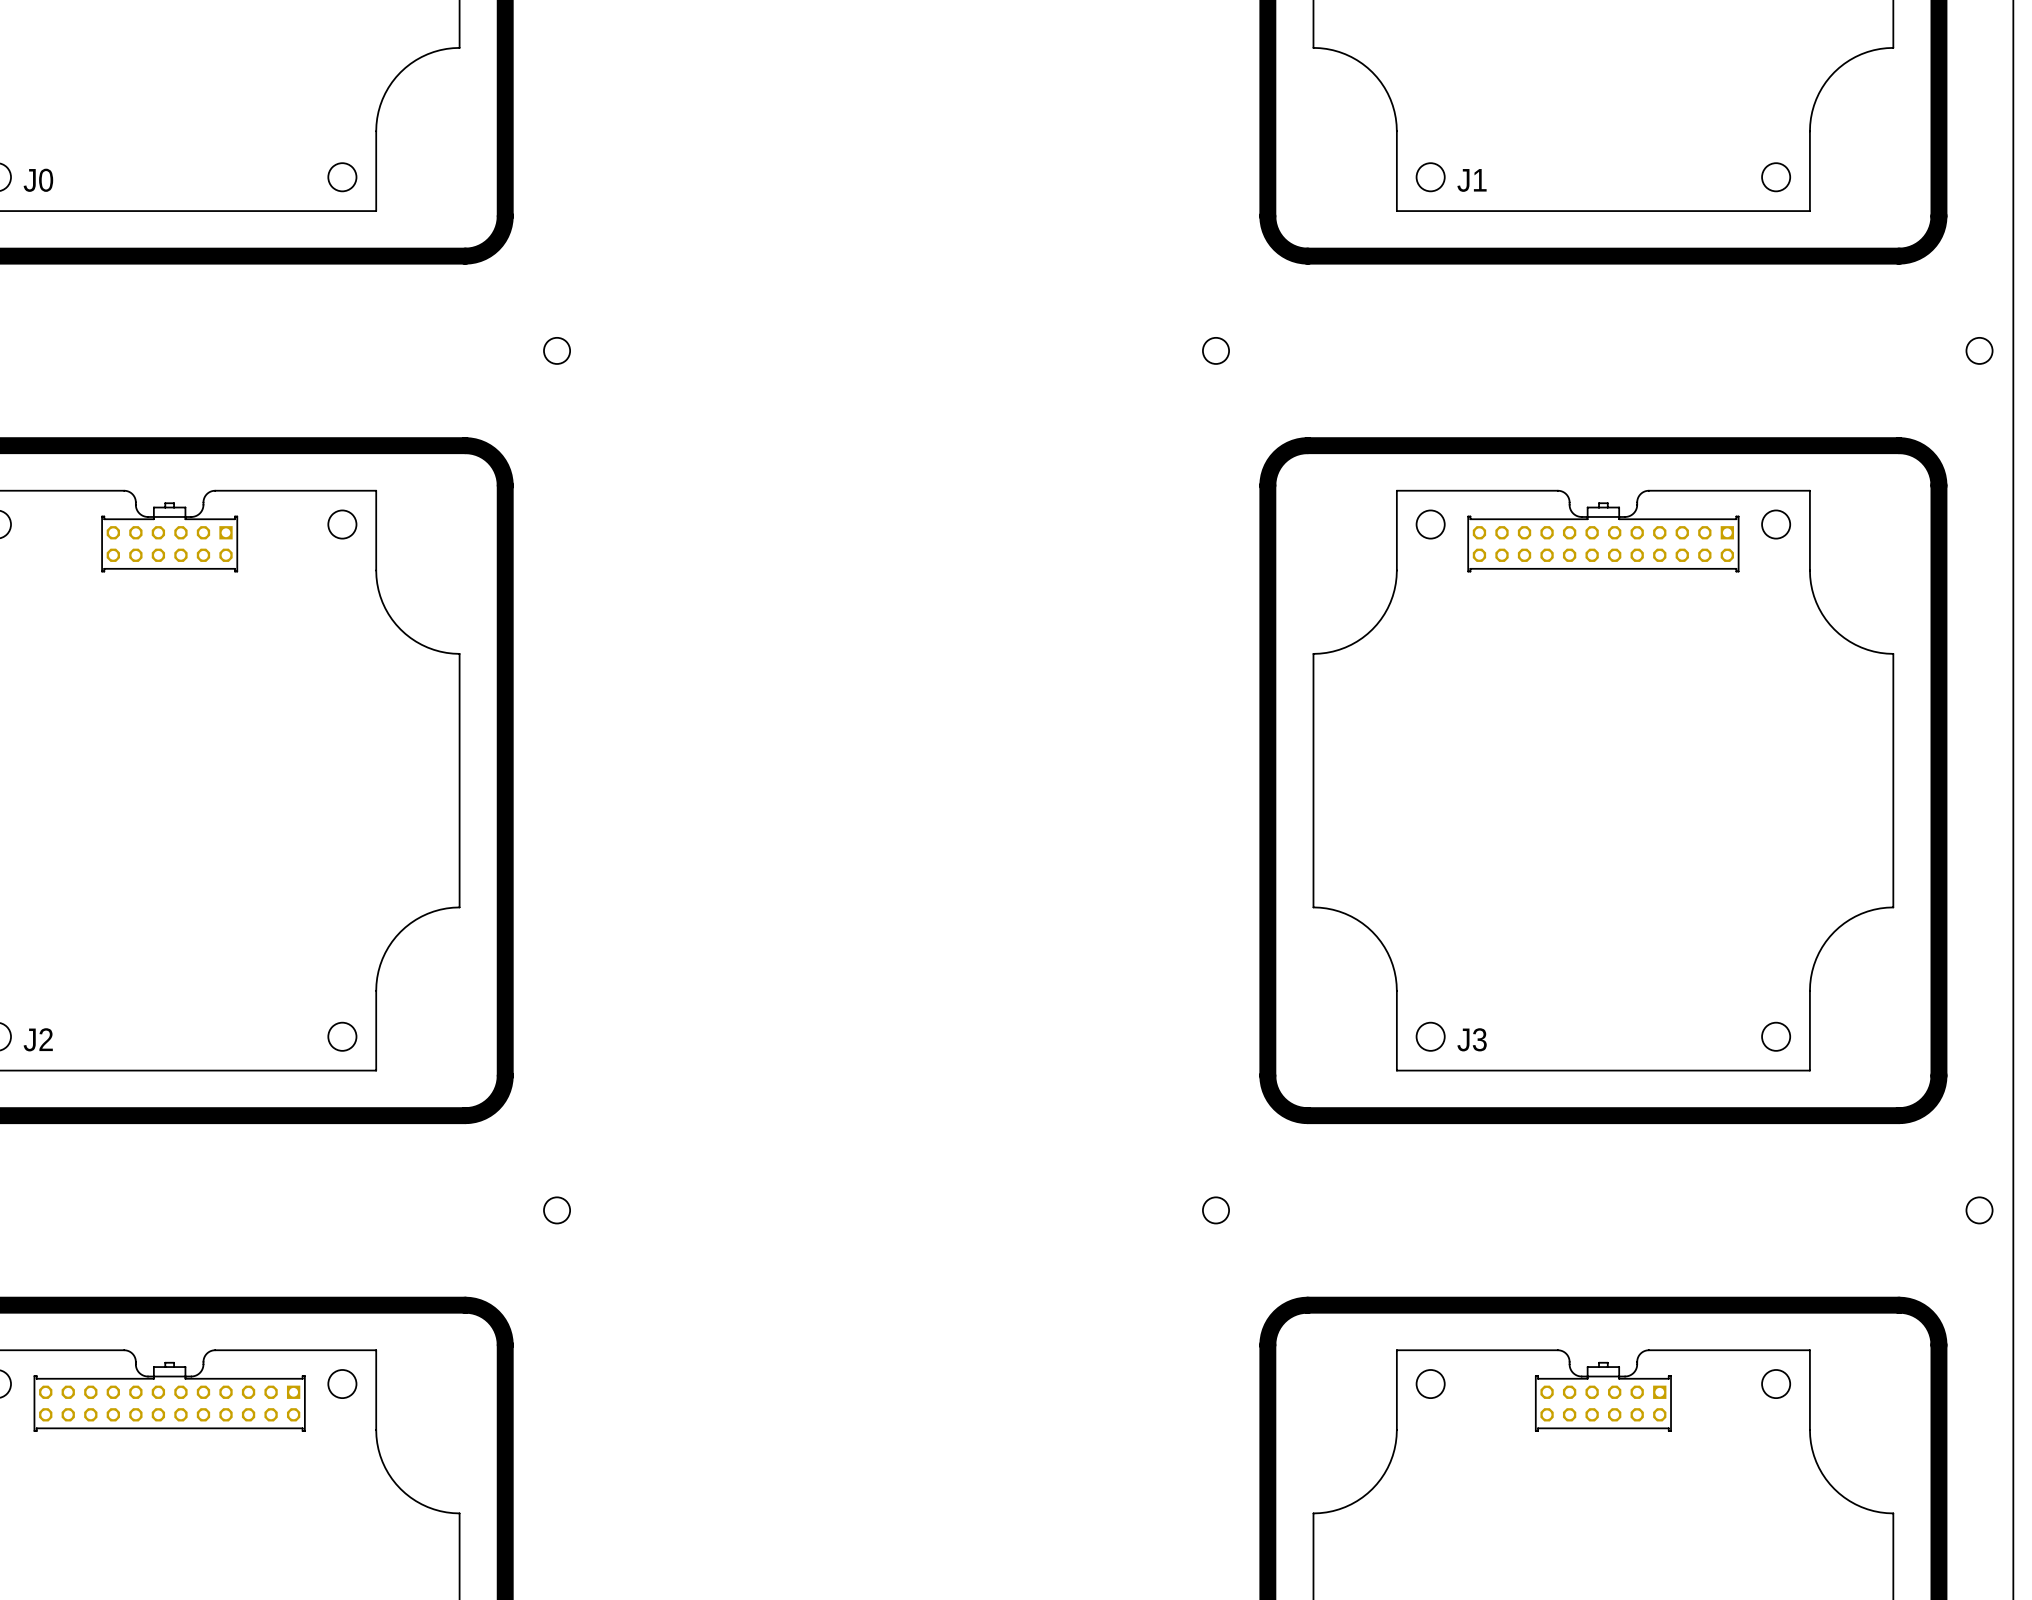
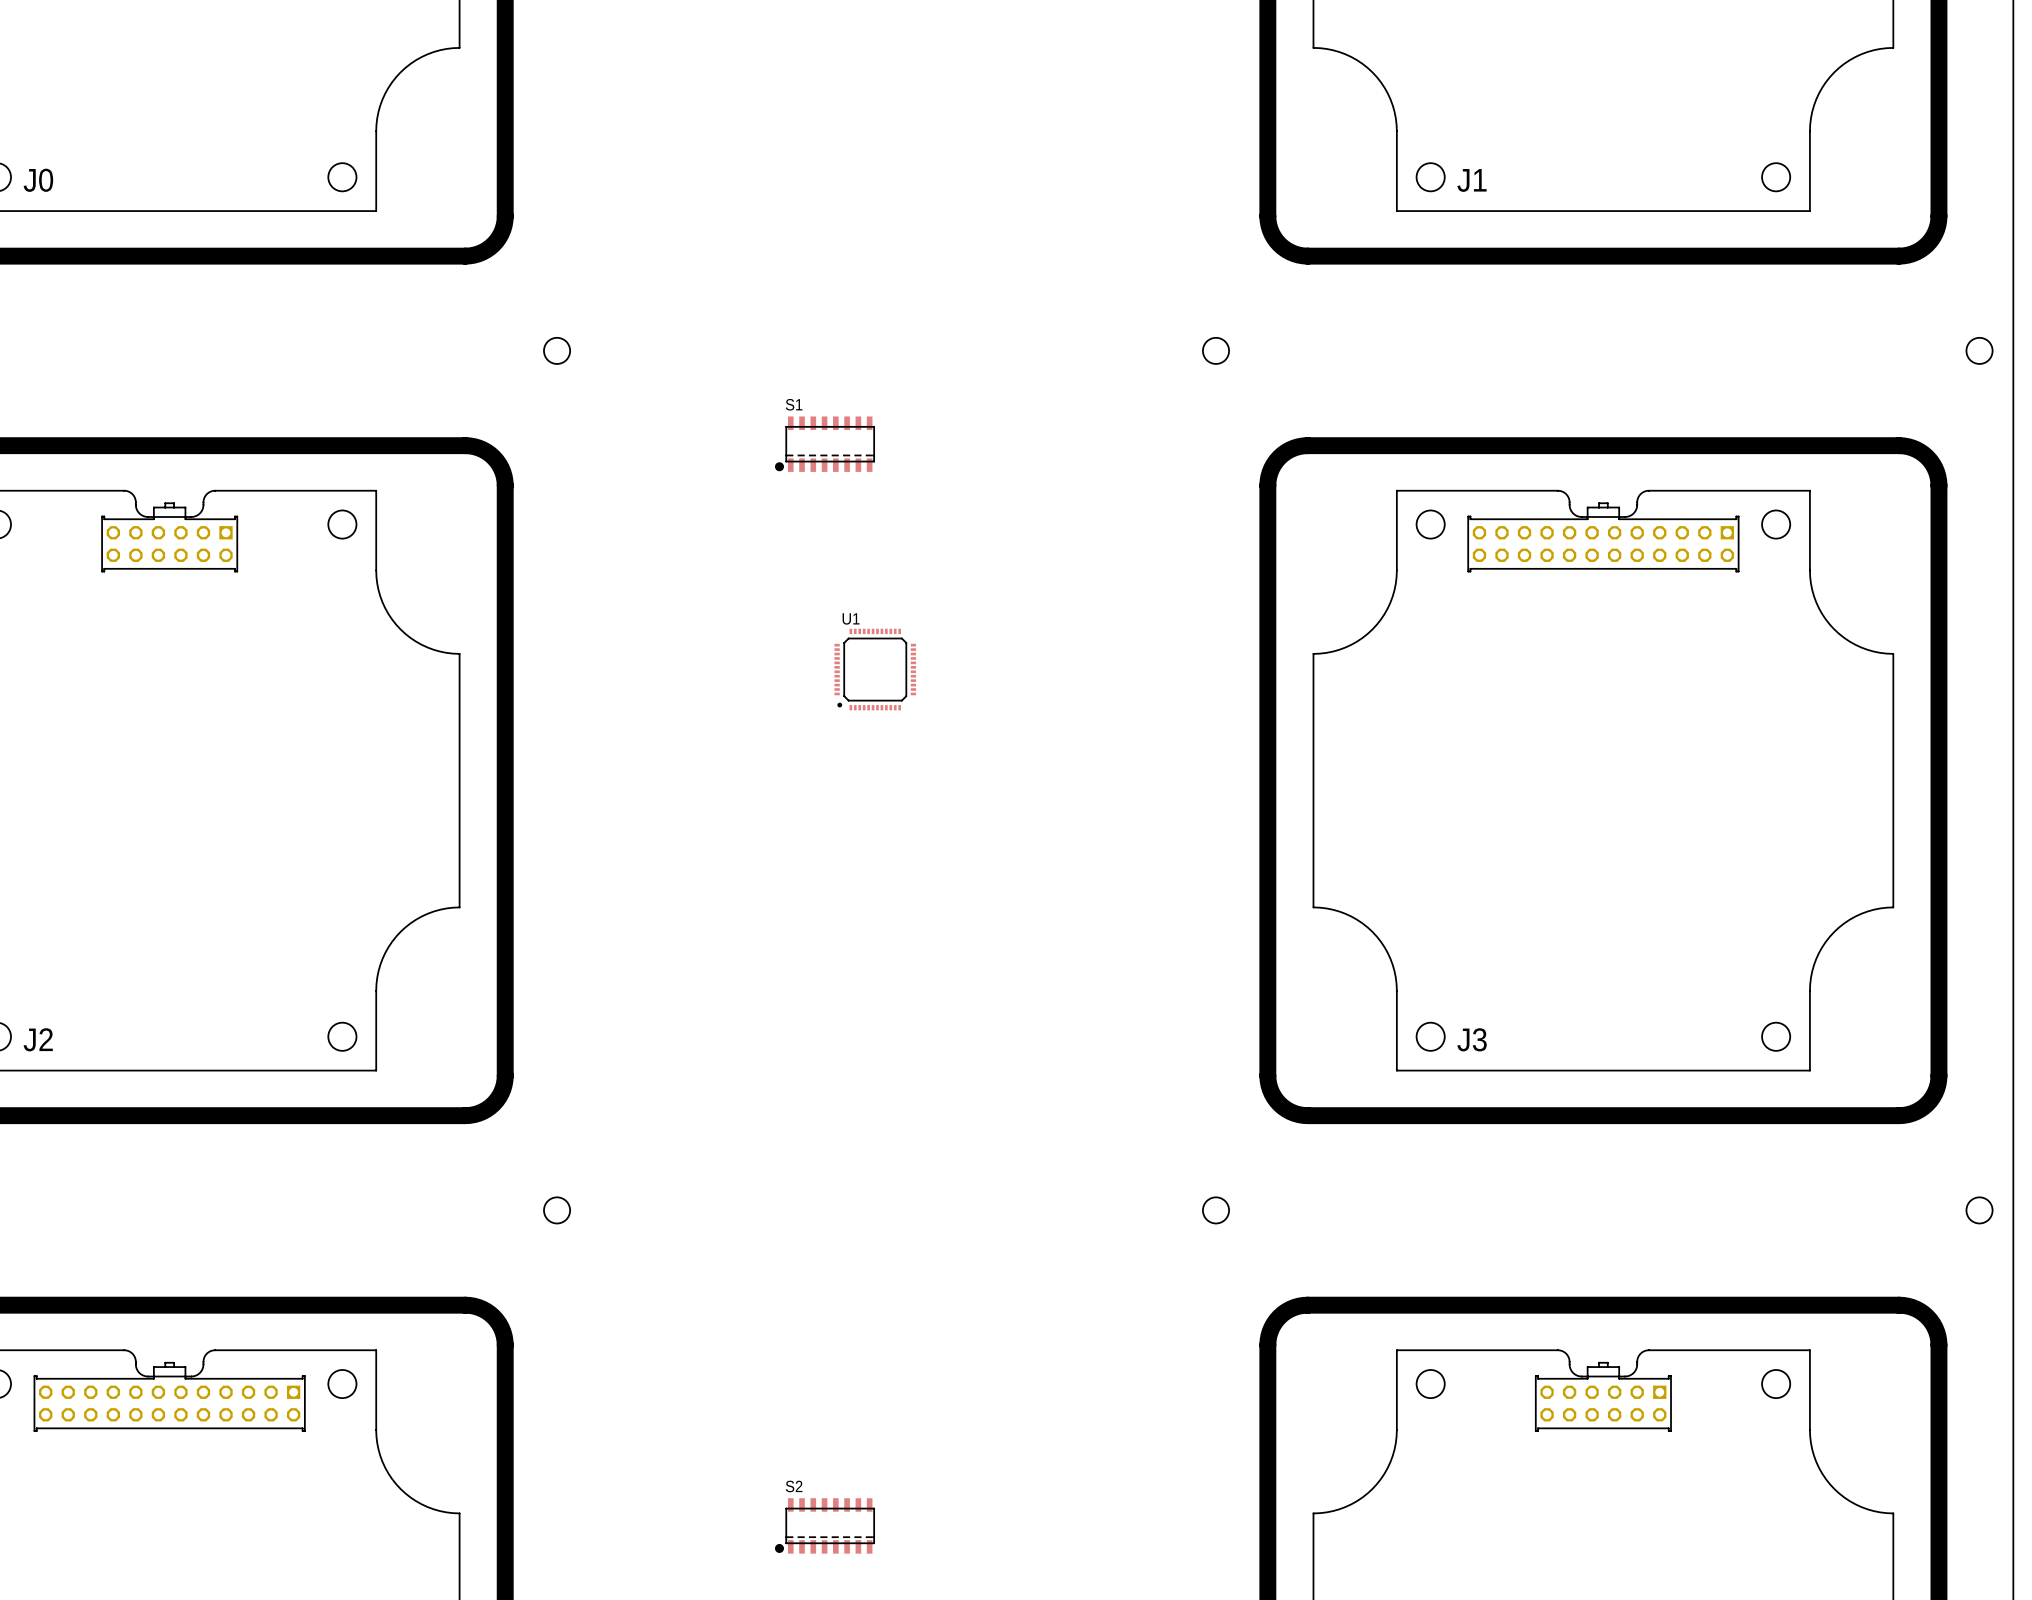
S1: none -> (824, 444)
U1: none -> (875, 669)
S2: none -> (824, 1525)

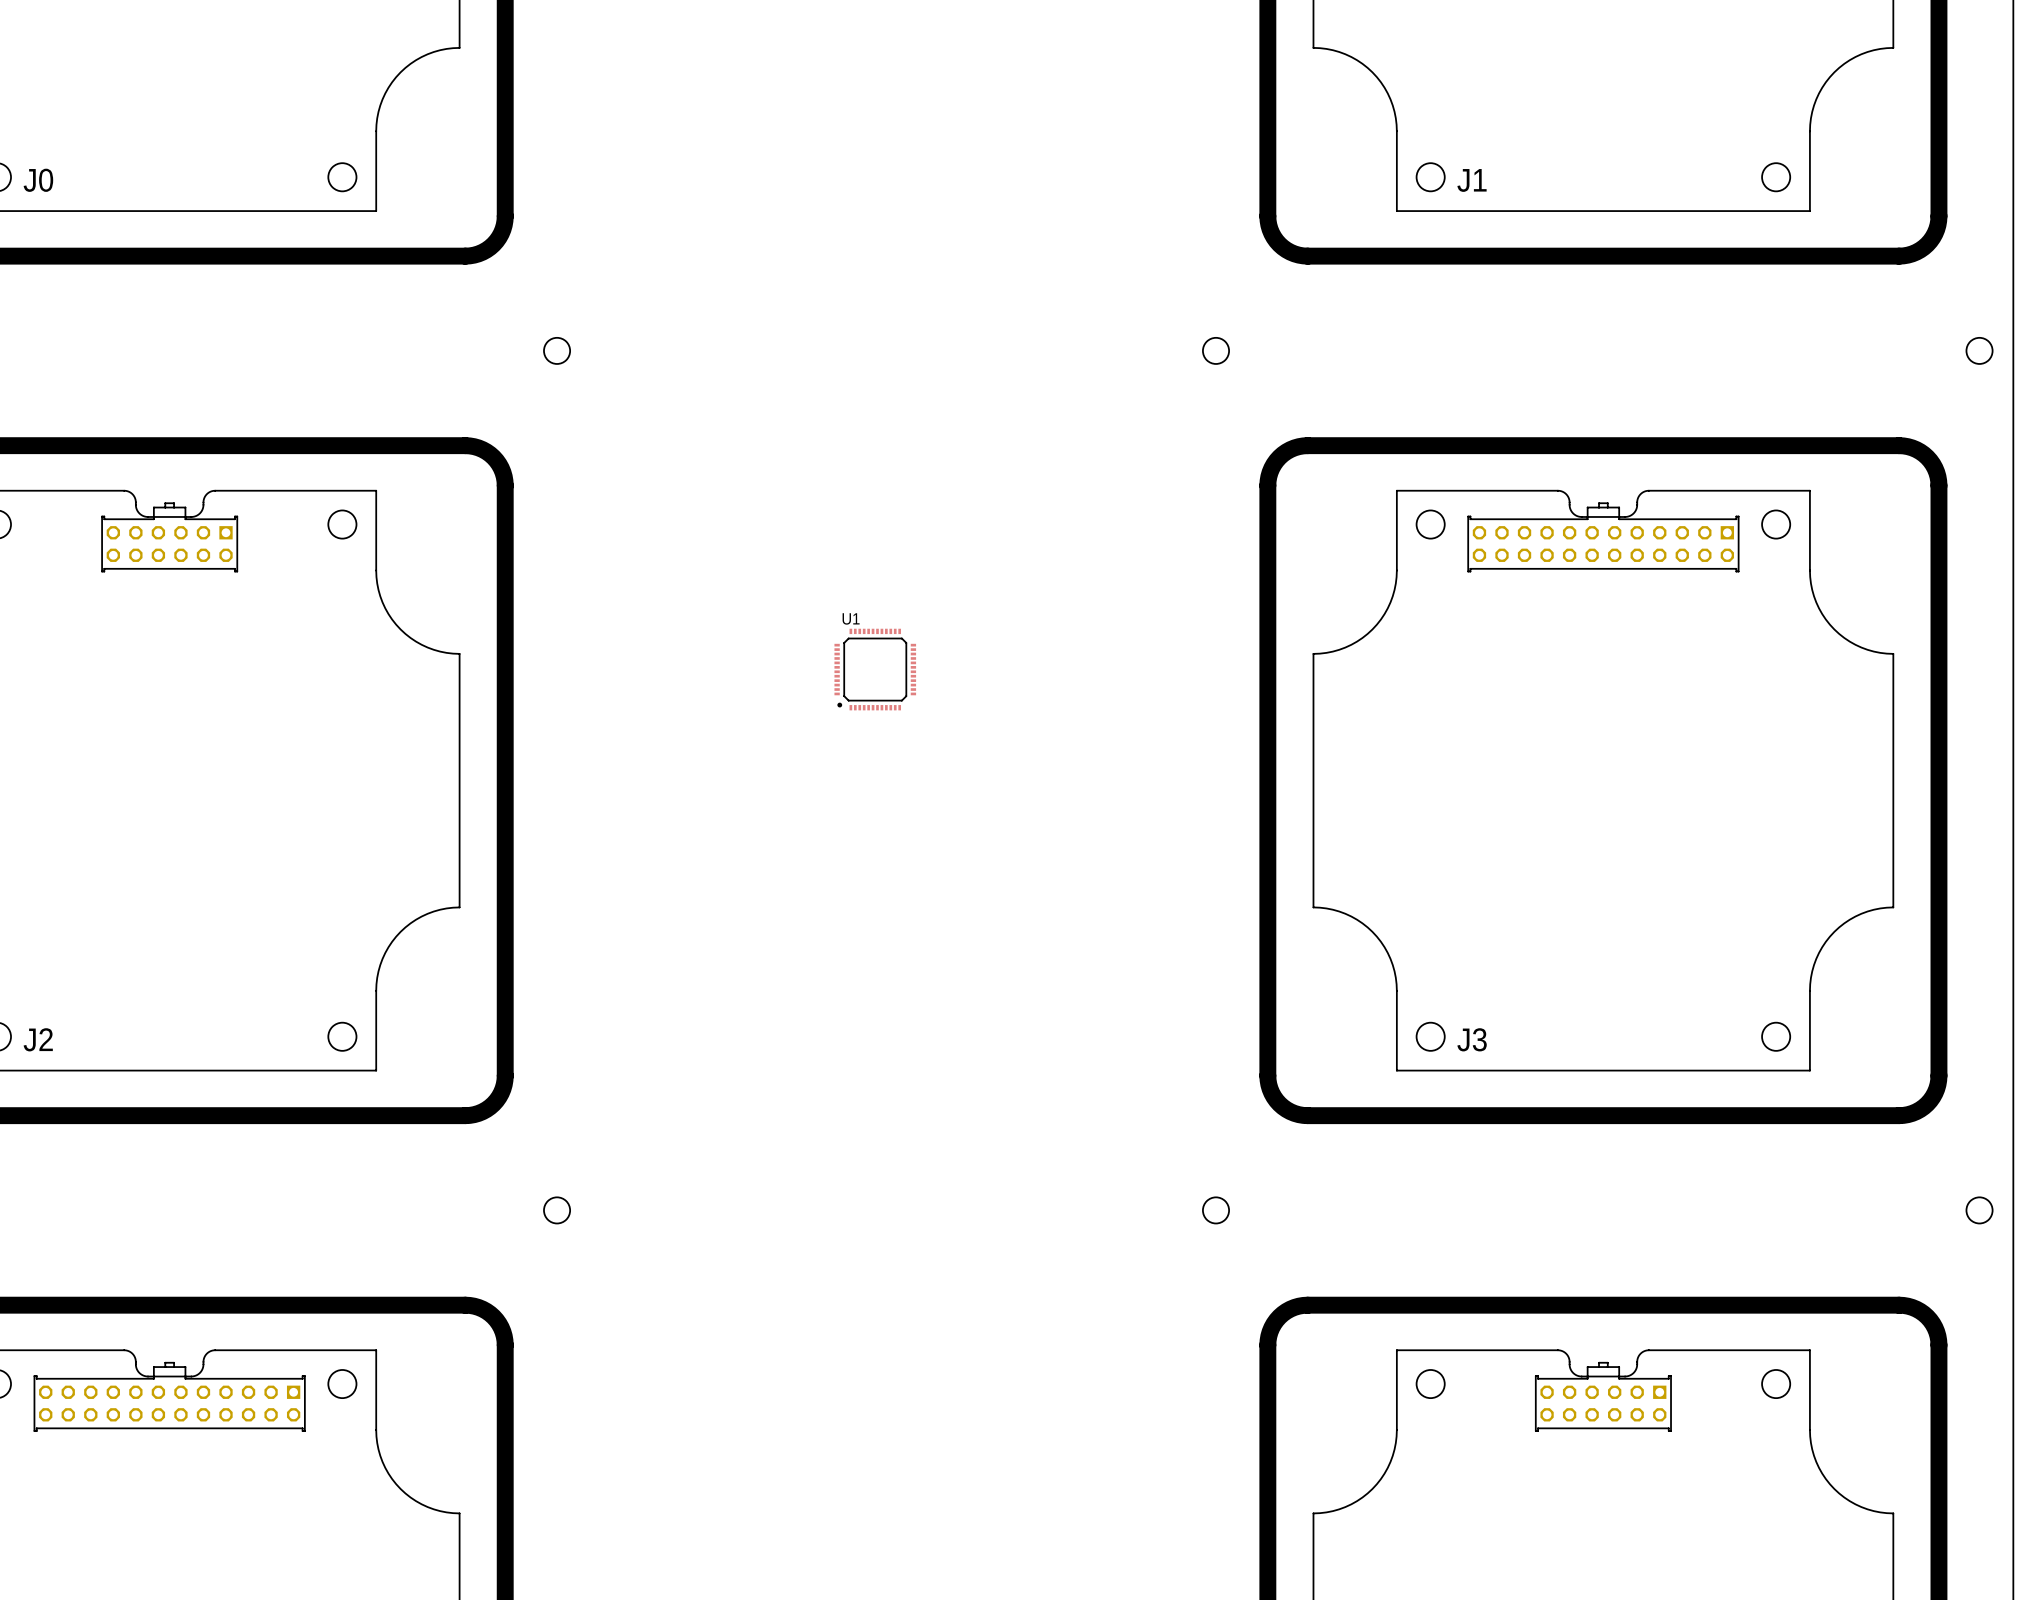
S1: (824, 444) -> none
S2: (824, 1525) -> none

